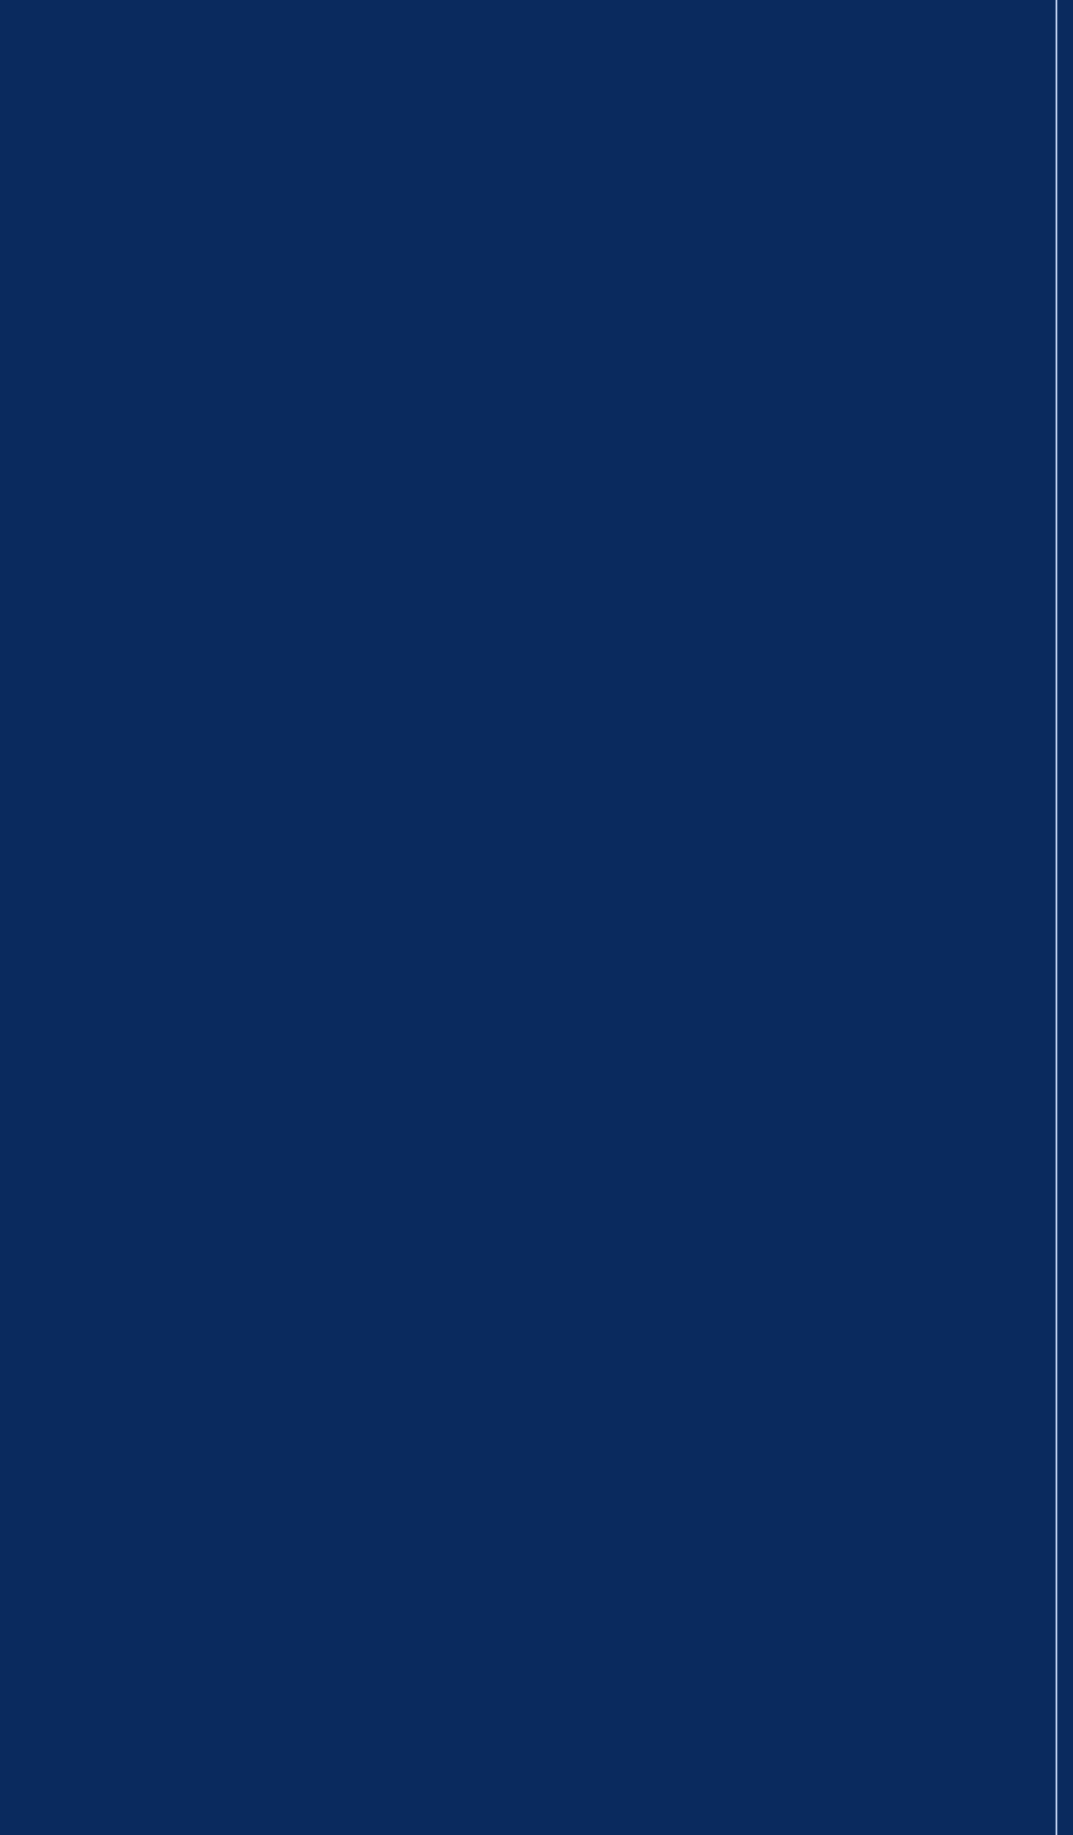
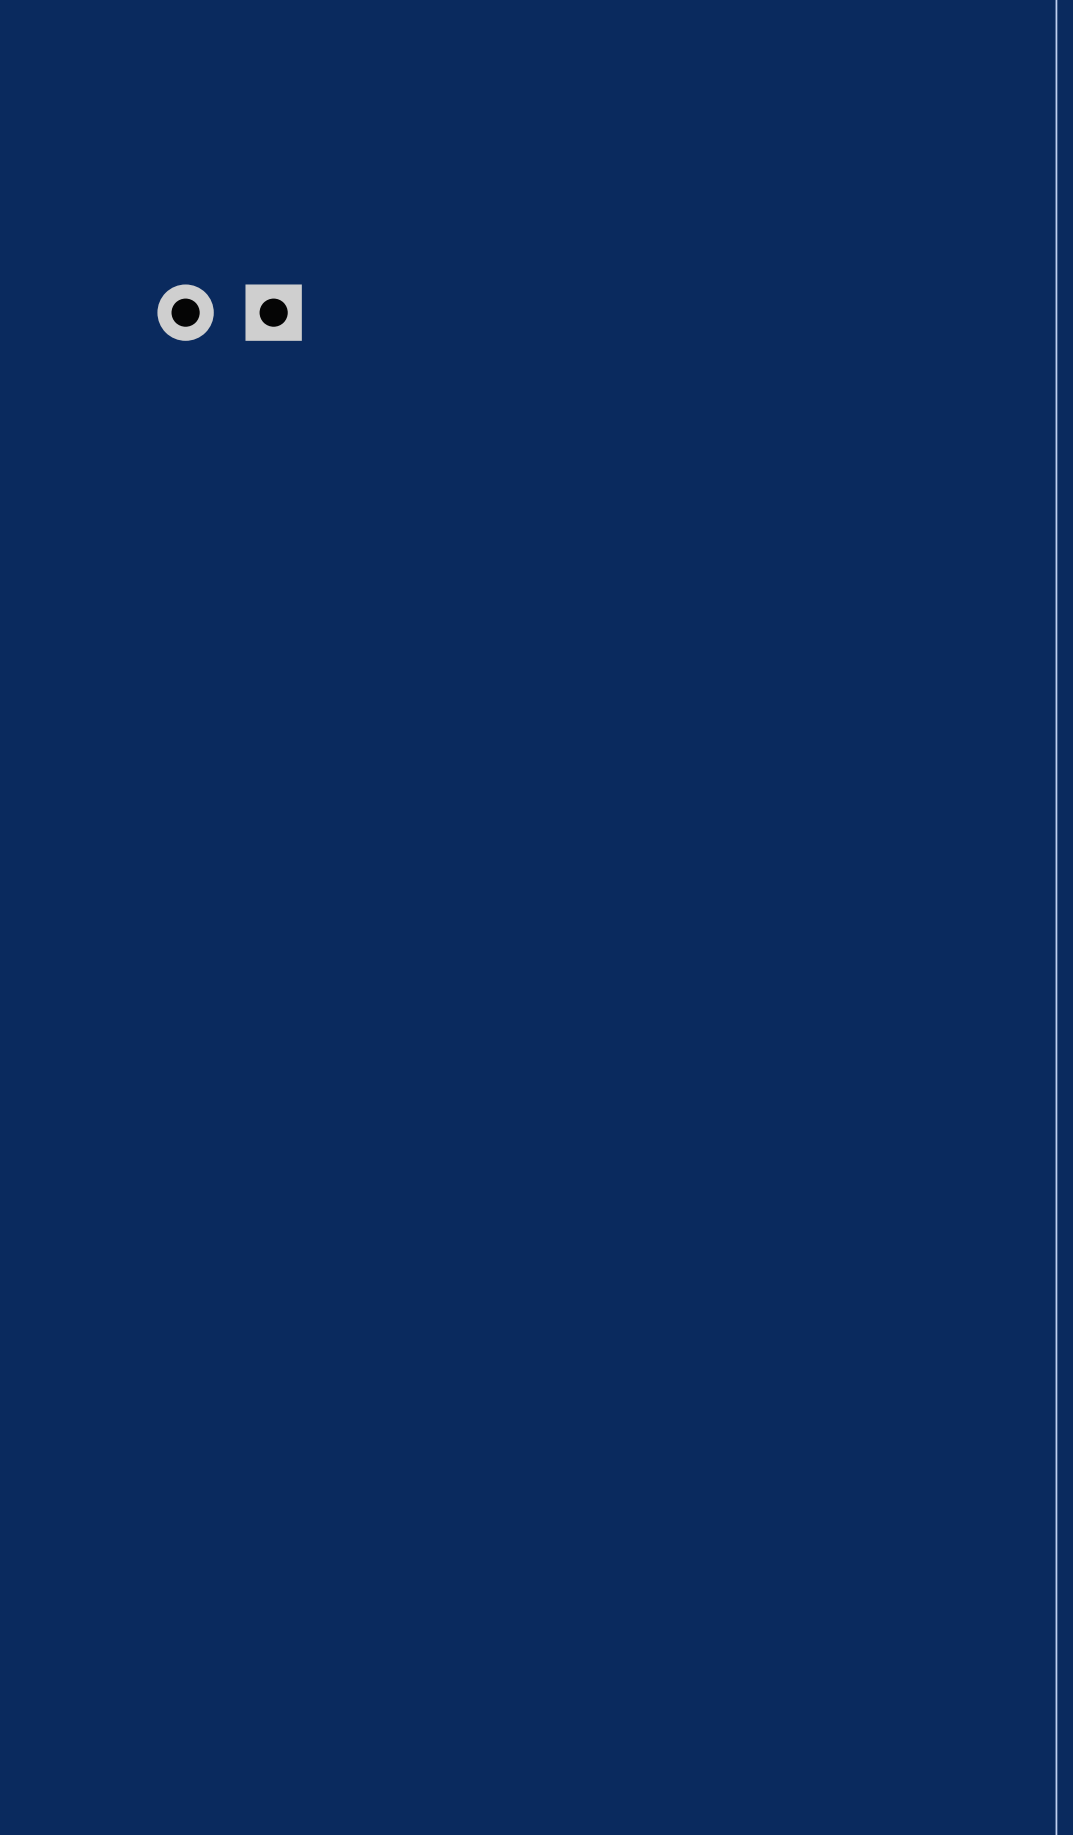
part: none -> (229, 312)

